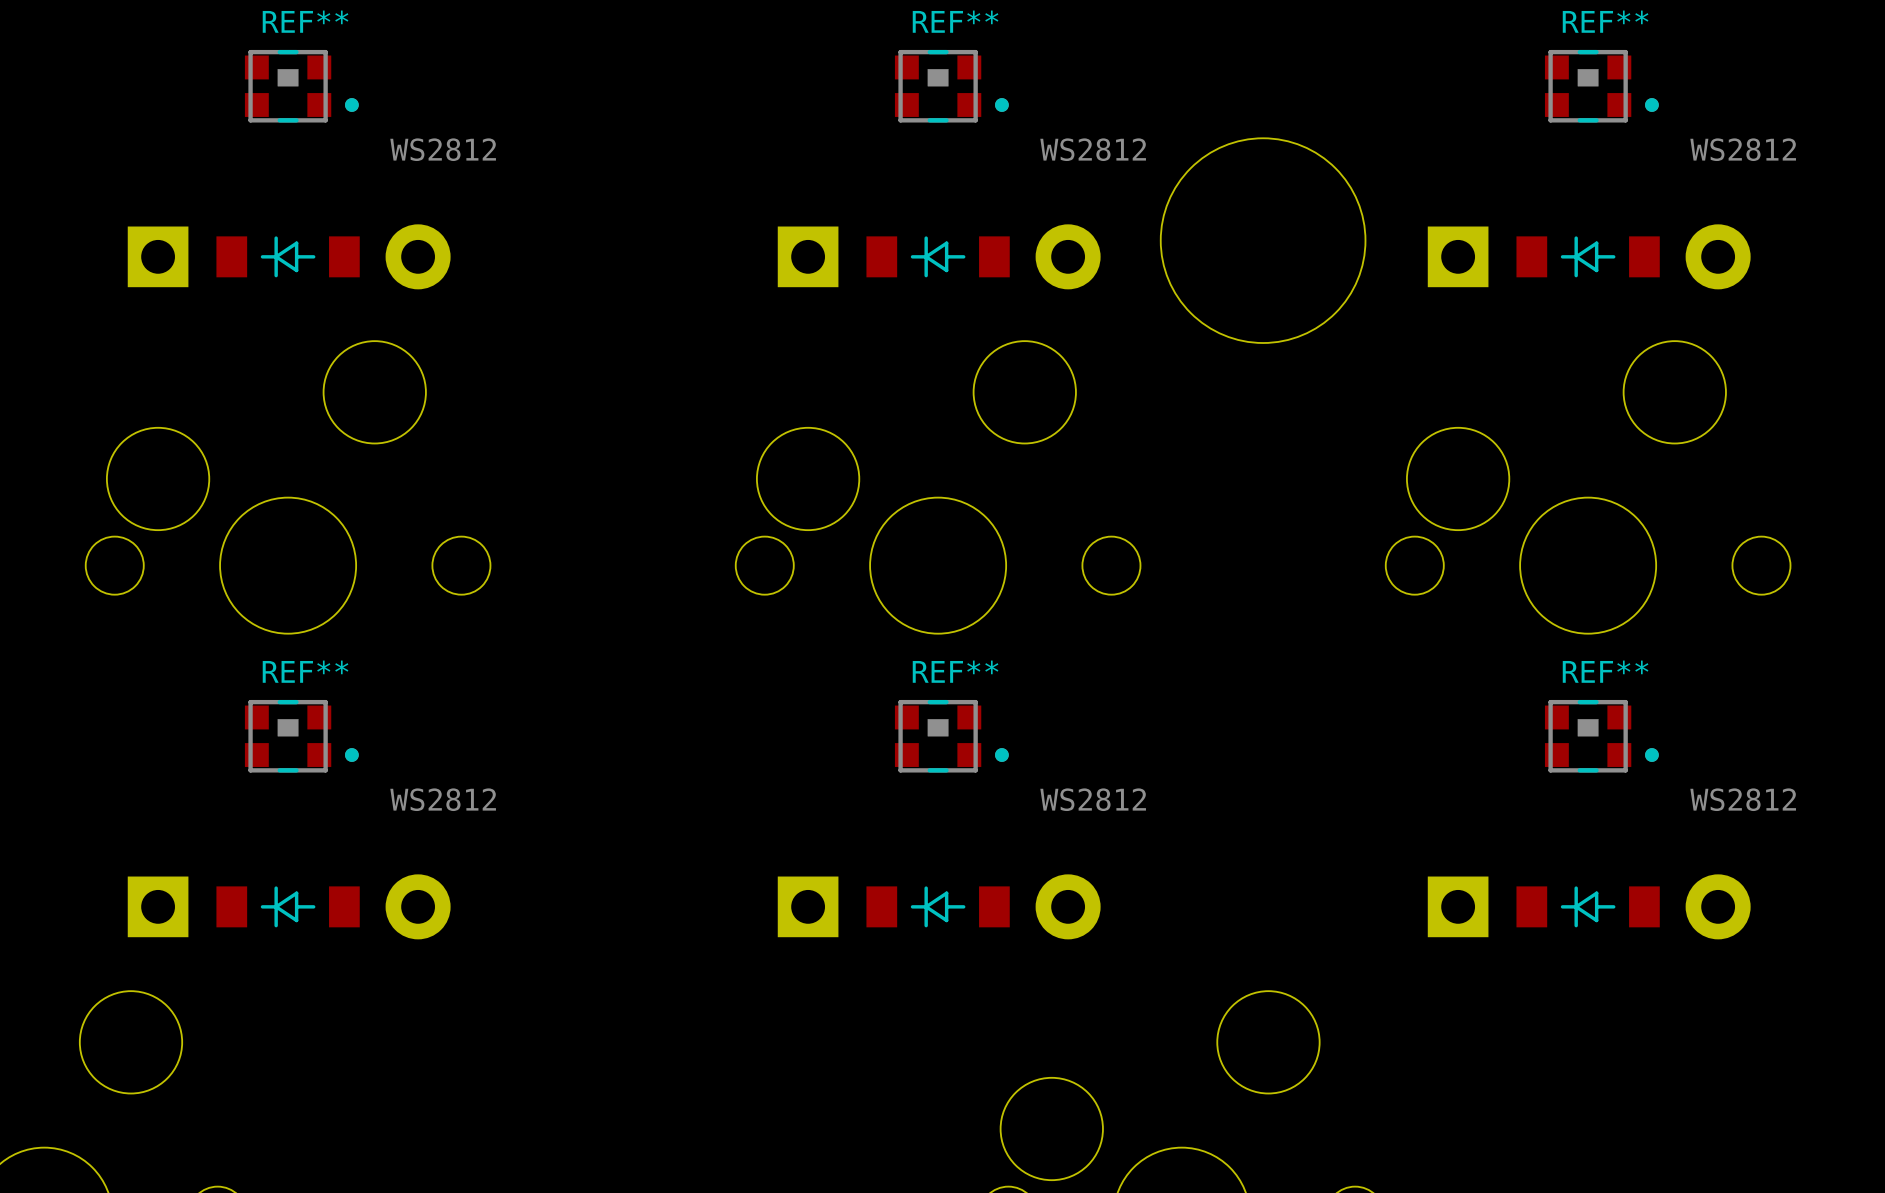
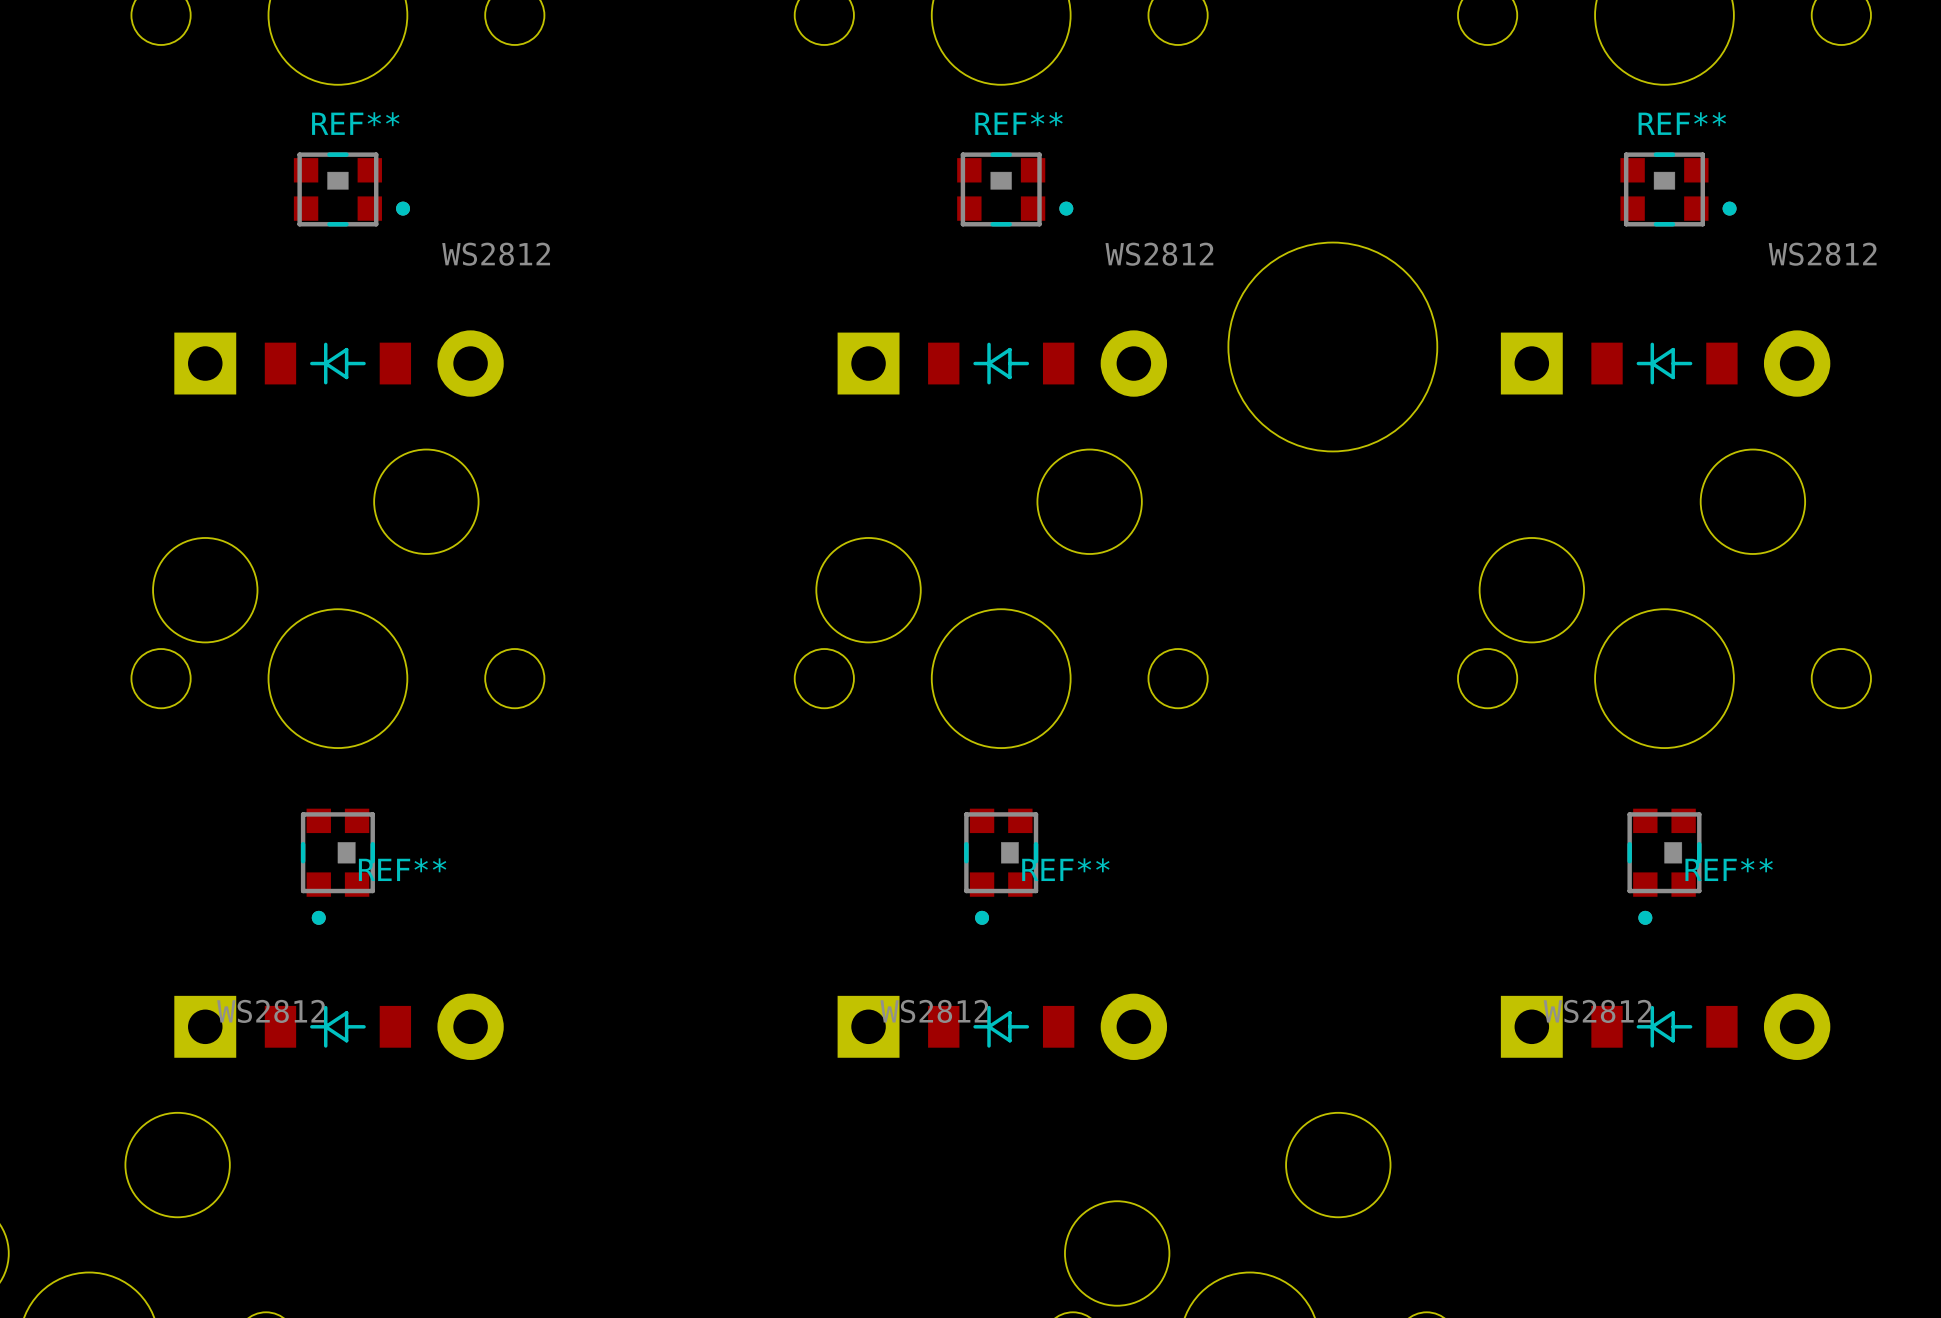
REF** rotation: 0° (301, 736) -> 90° clockwise (337, 866)
REF** rotation: 0° (951, 736) -> 90° clockwise (1001, 866)
REF** rotation: 0° (1601, 736) -> 90° clockwise (1664, 866)

